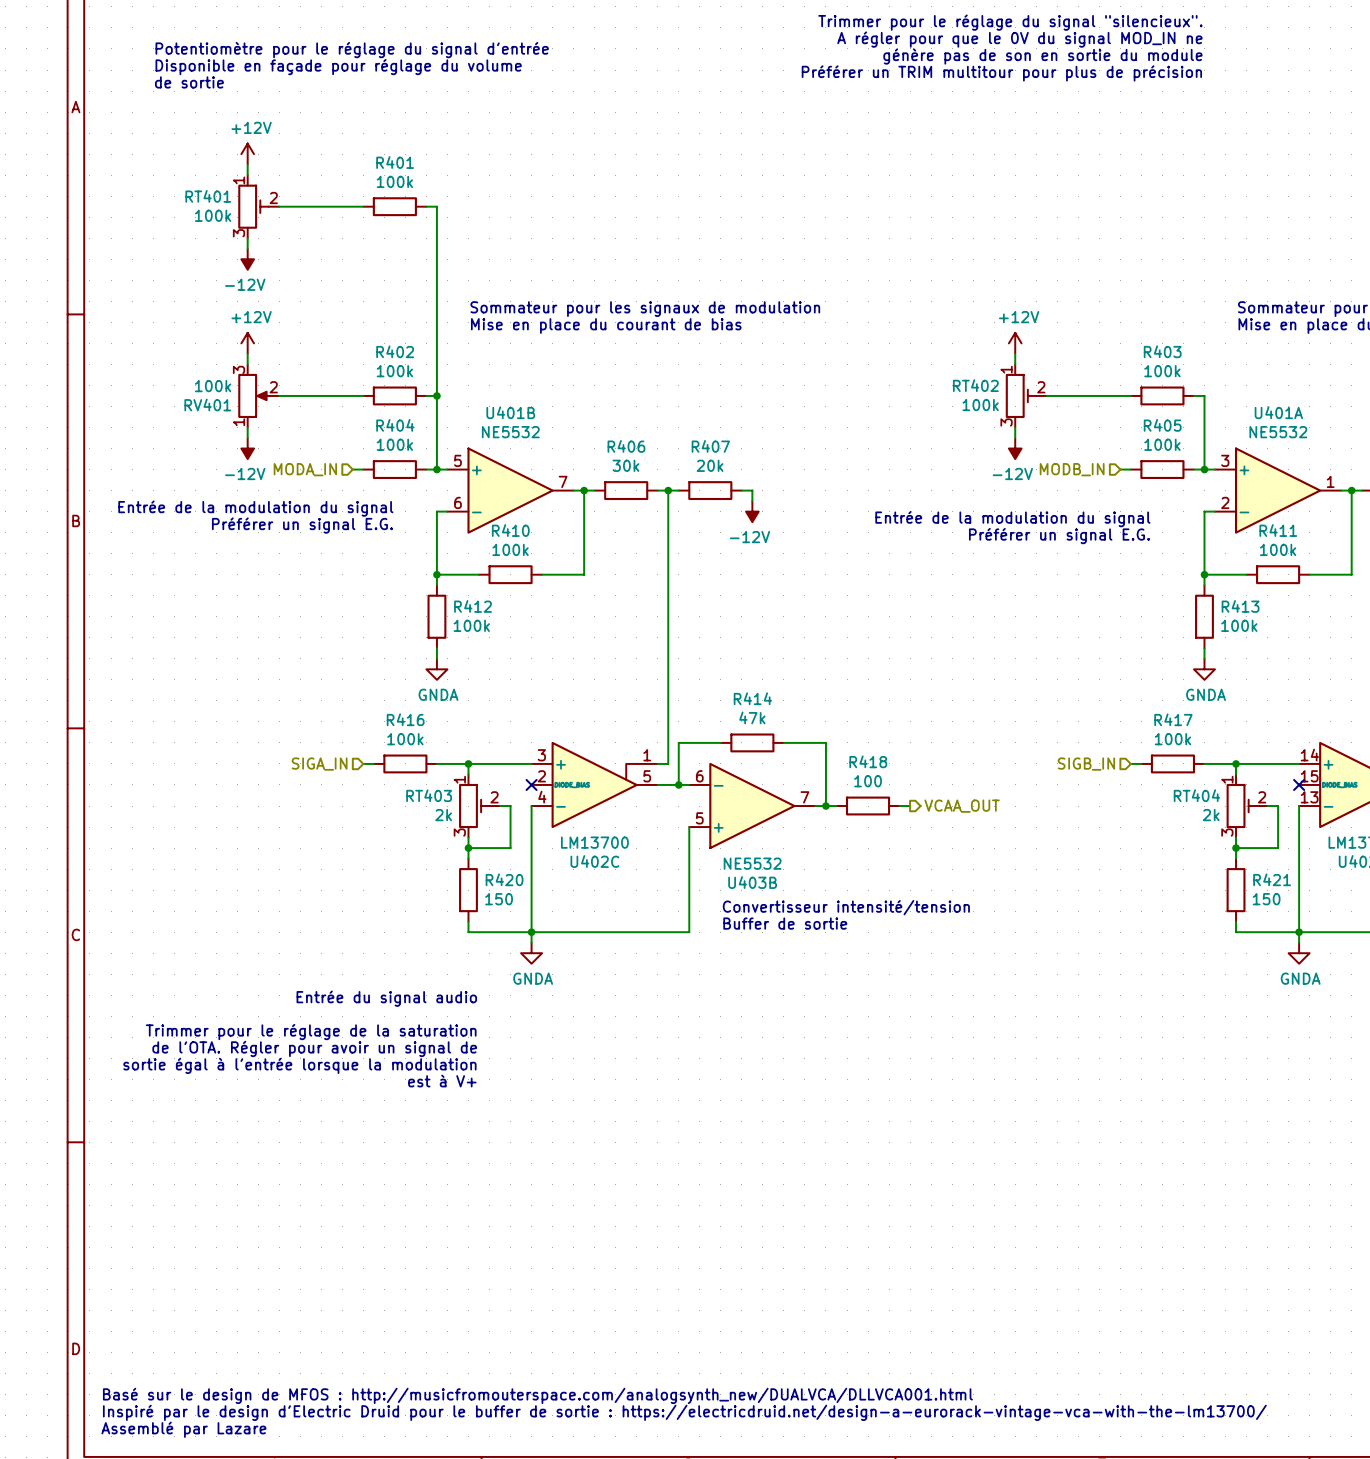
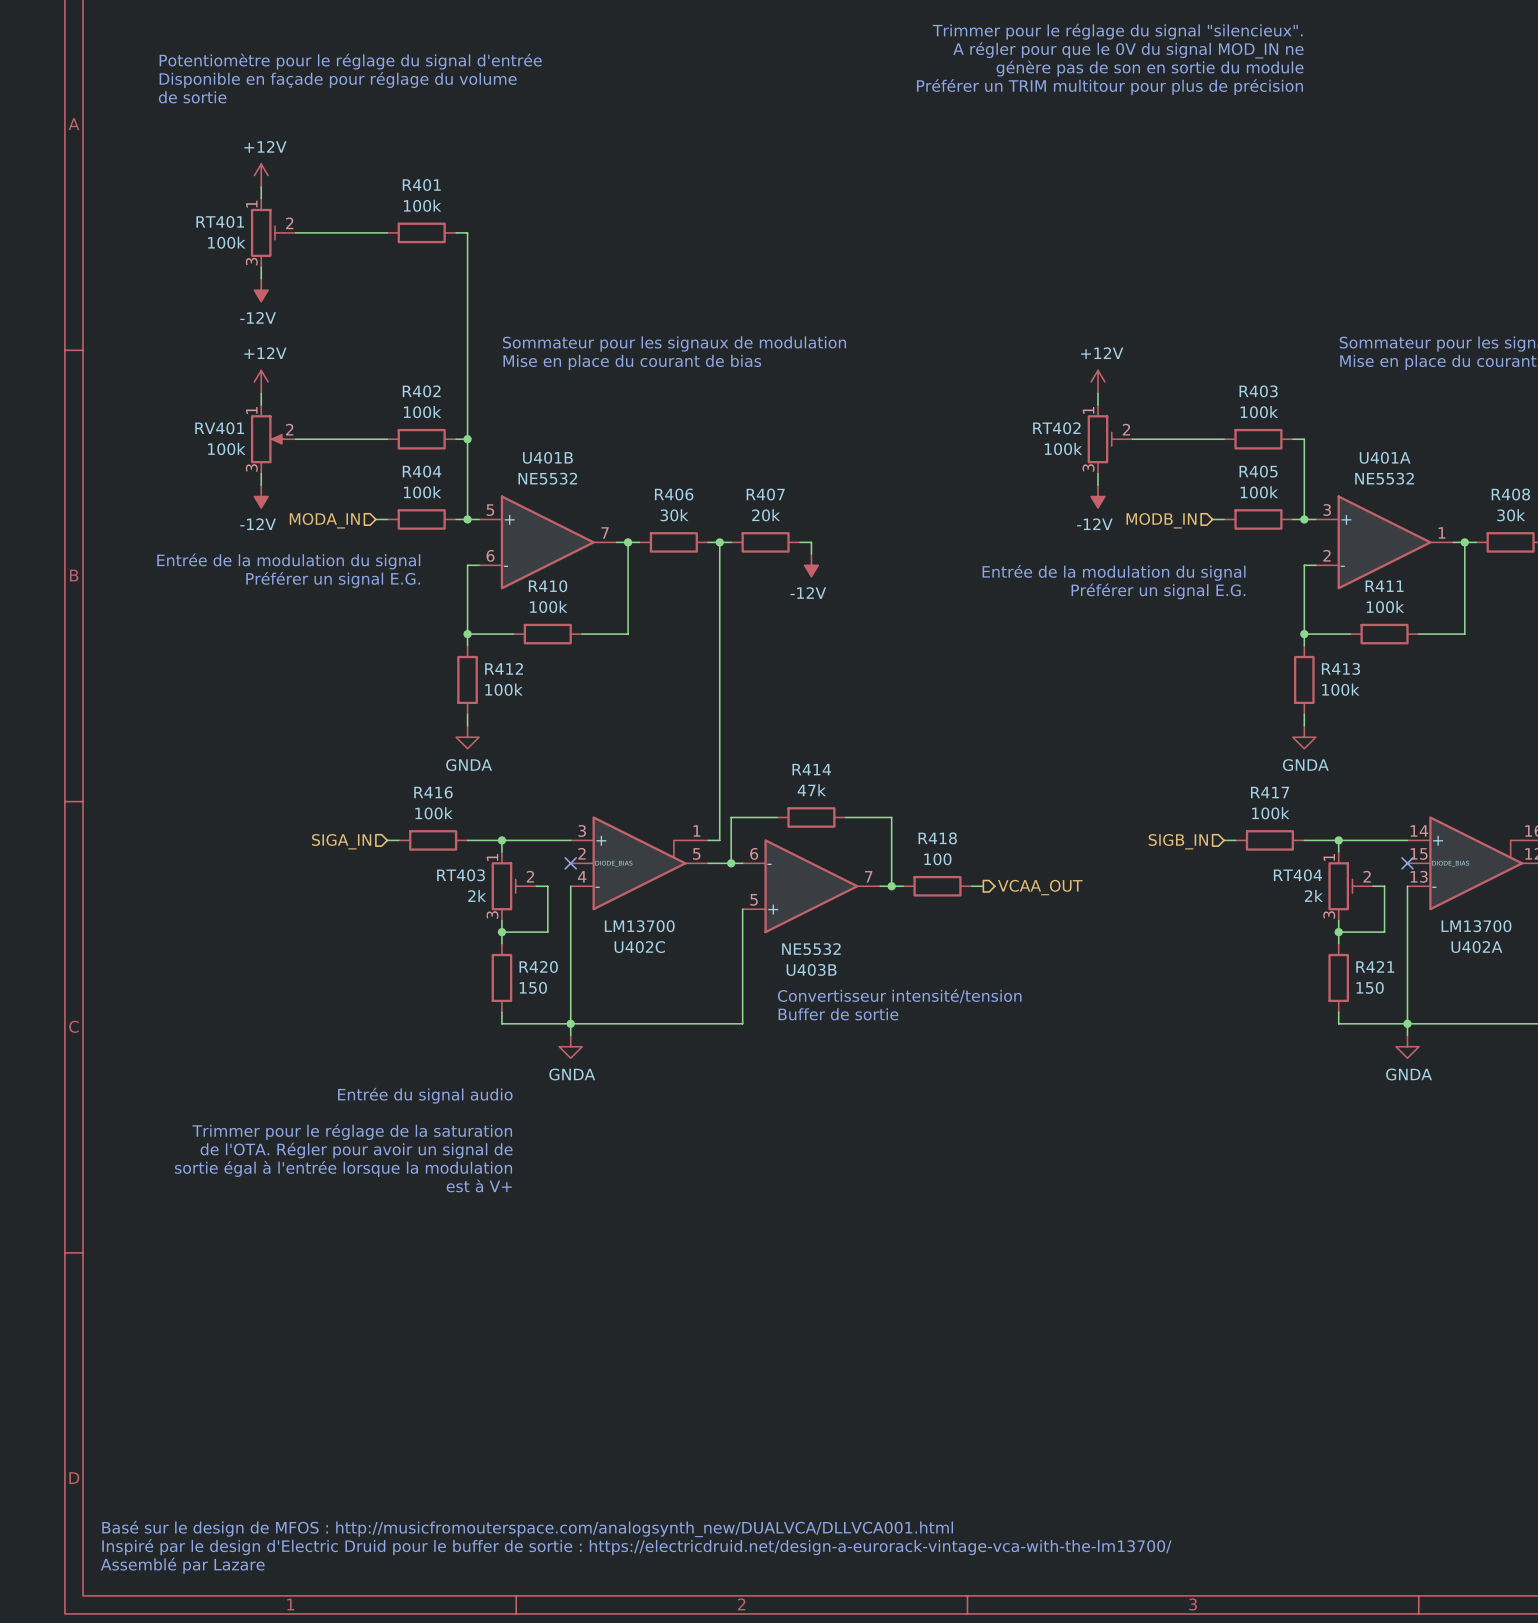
RV401 flip: as is (253, 395) -> up-down (267, 439)

